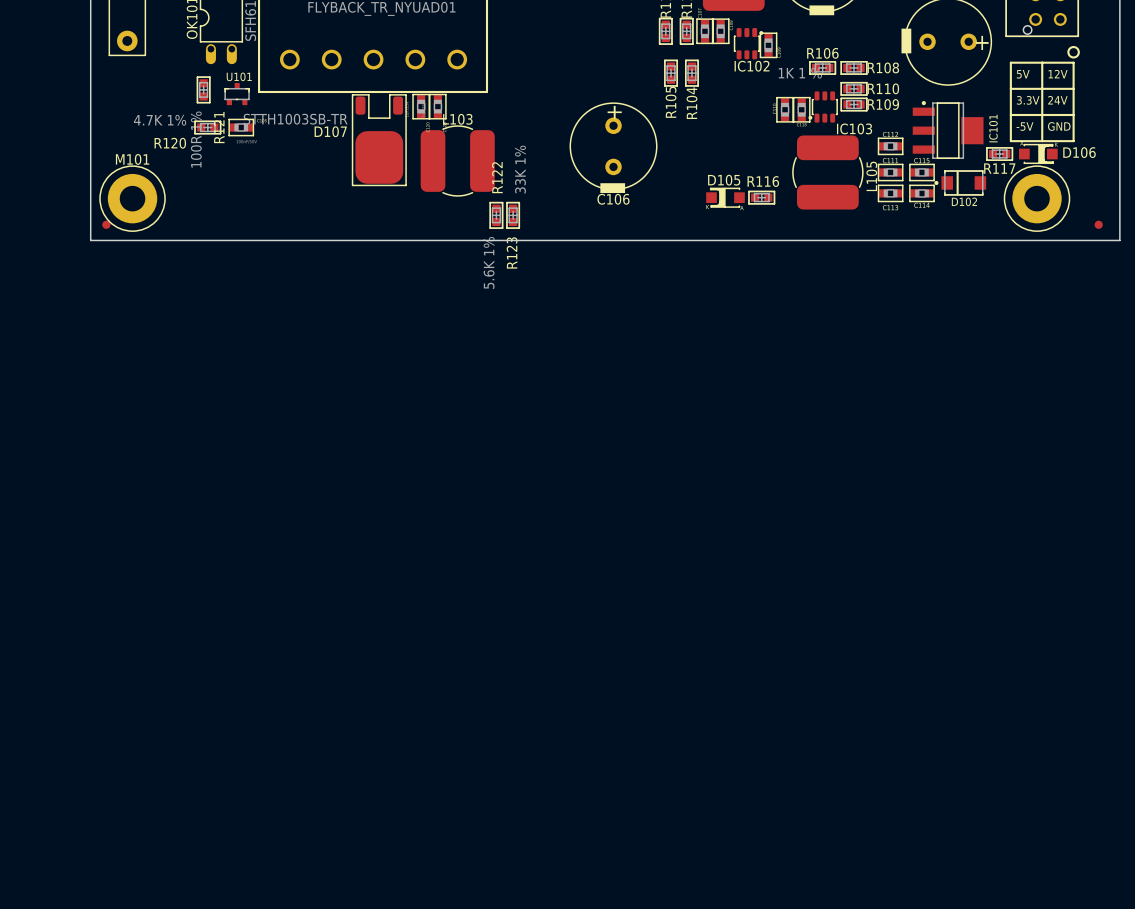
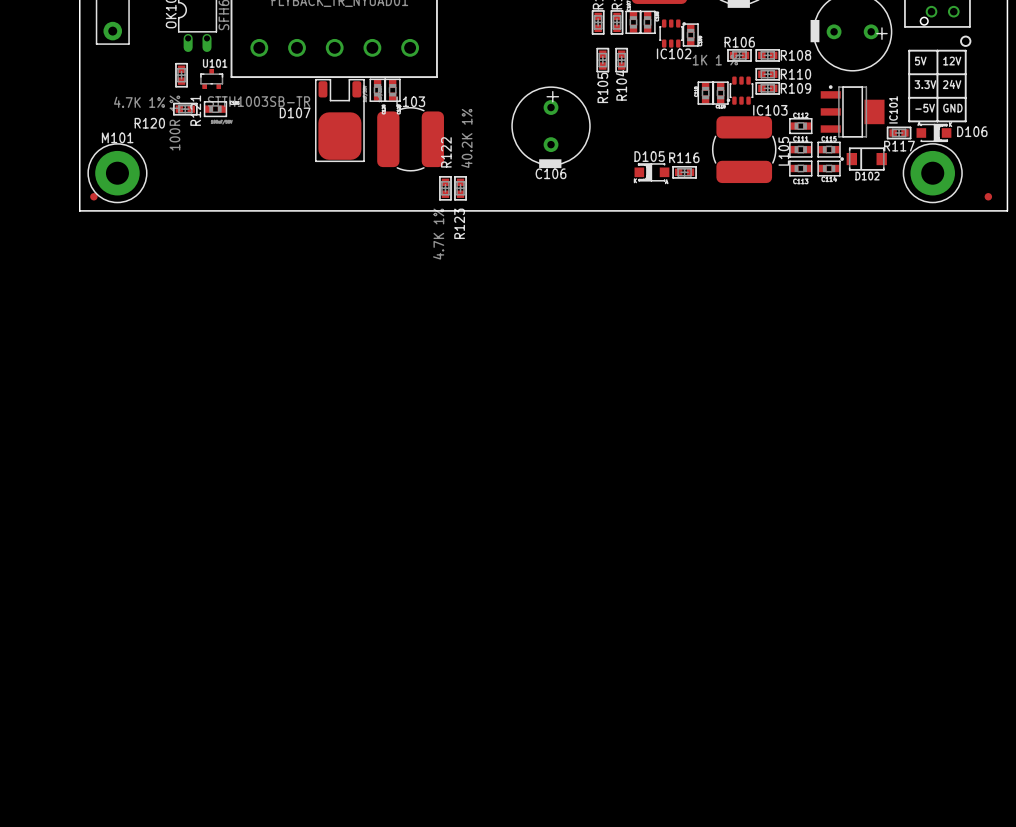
R122 value: 33K 1% (520, 169) -> 40.2K 1% (466, 138)
R123 value: 5.6K 1% (489, 262) -> 4.7K 1% (438, 234)

